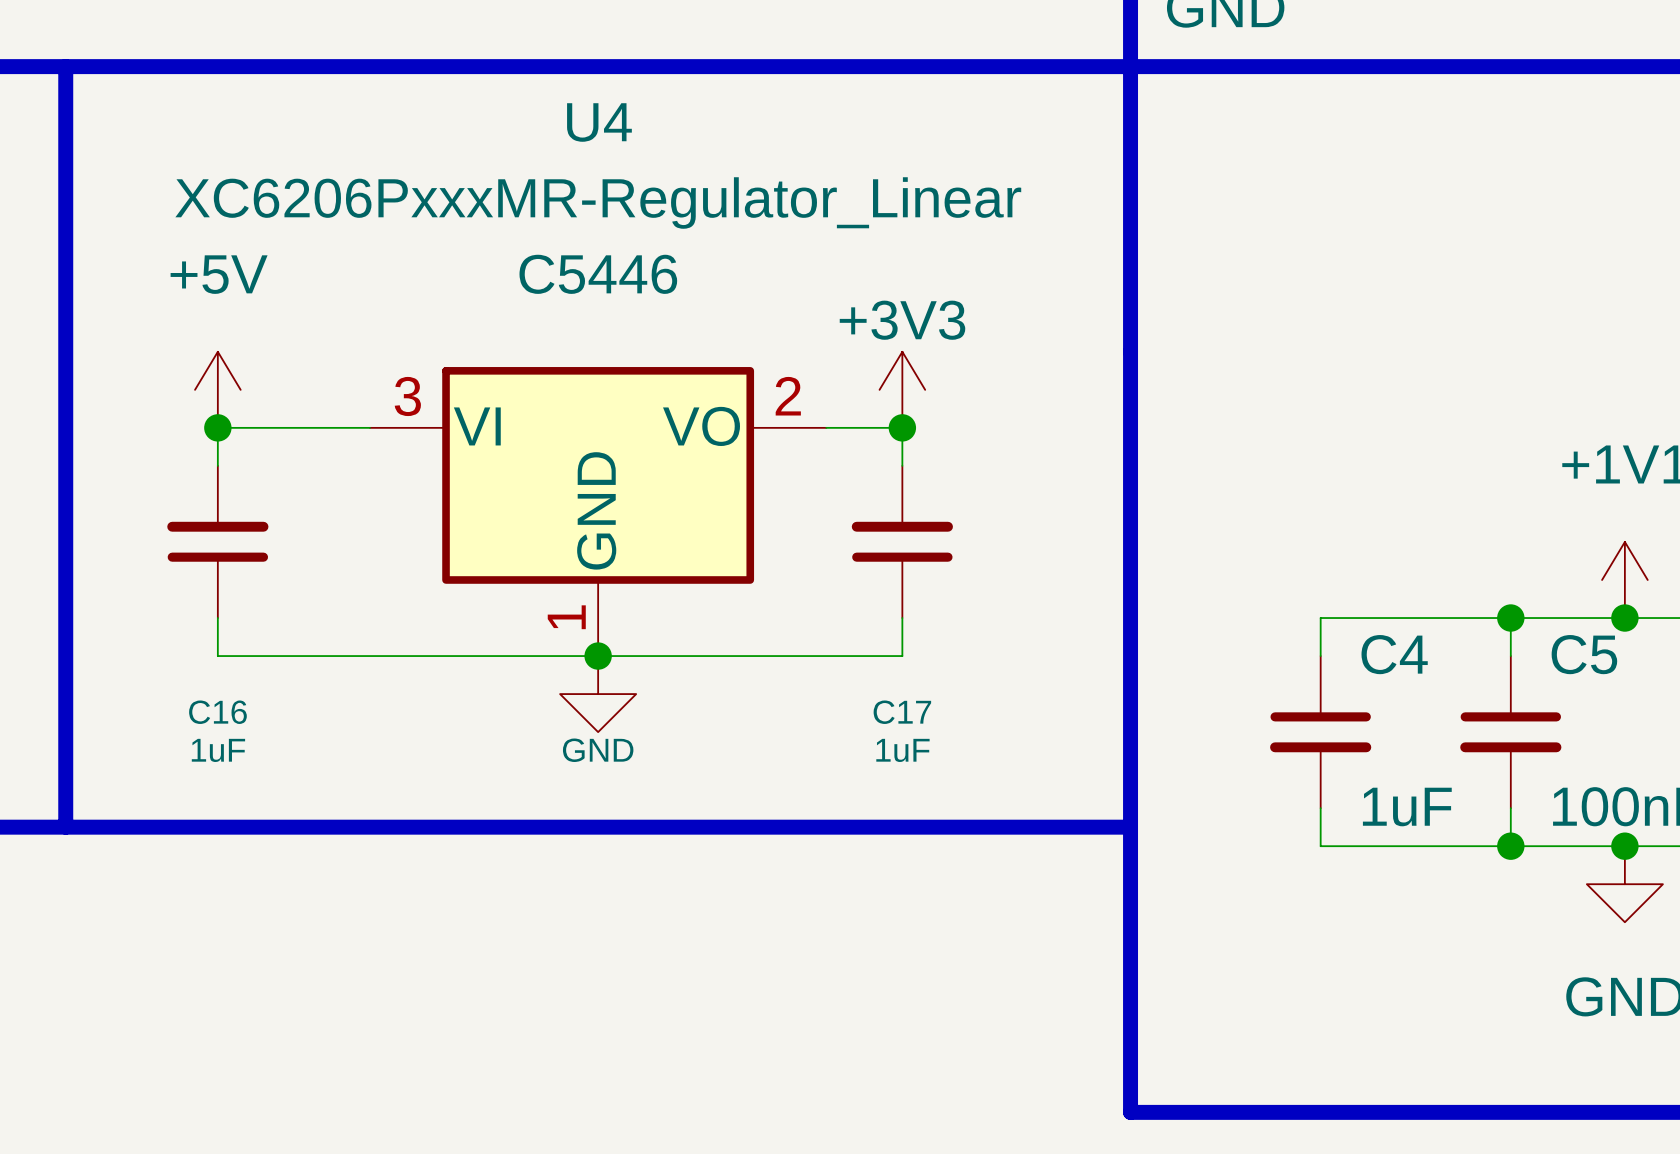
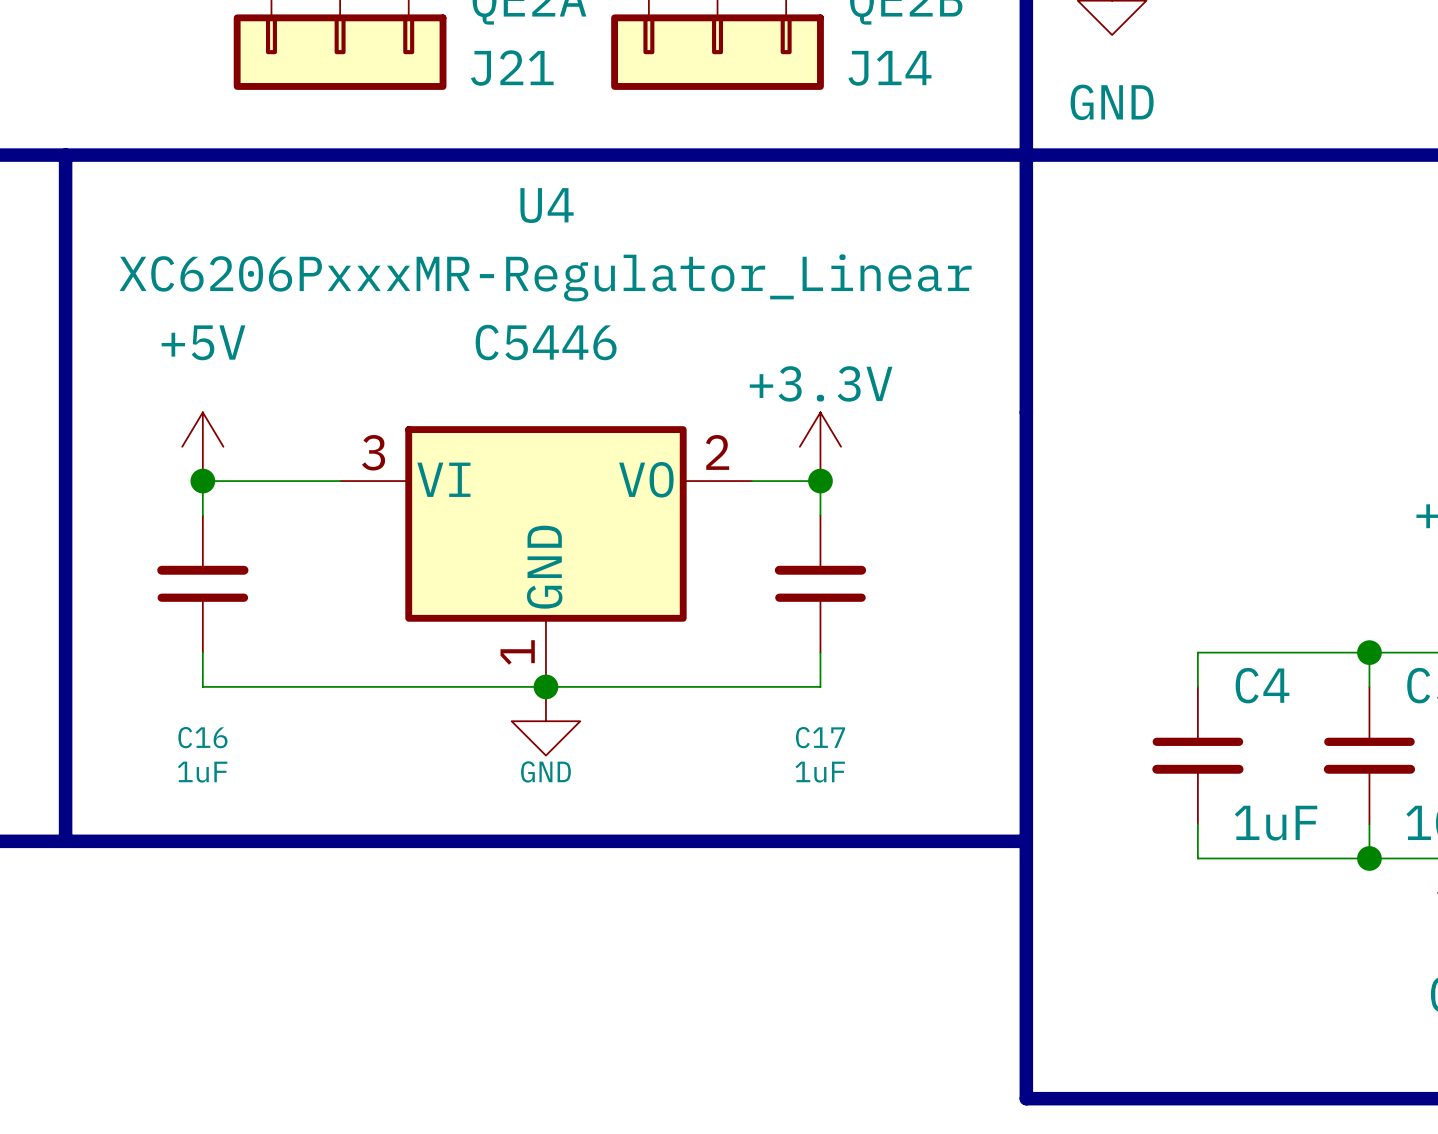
power symbol: +3V3 (902, 389) -> +3.3V (820, 446)

